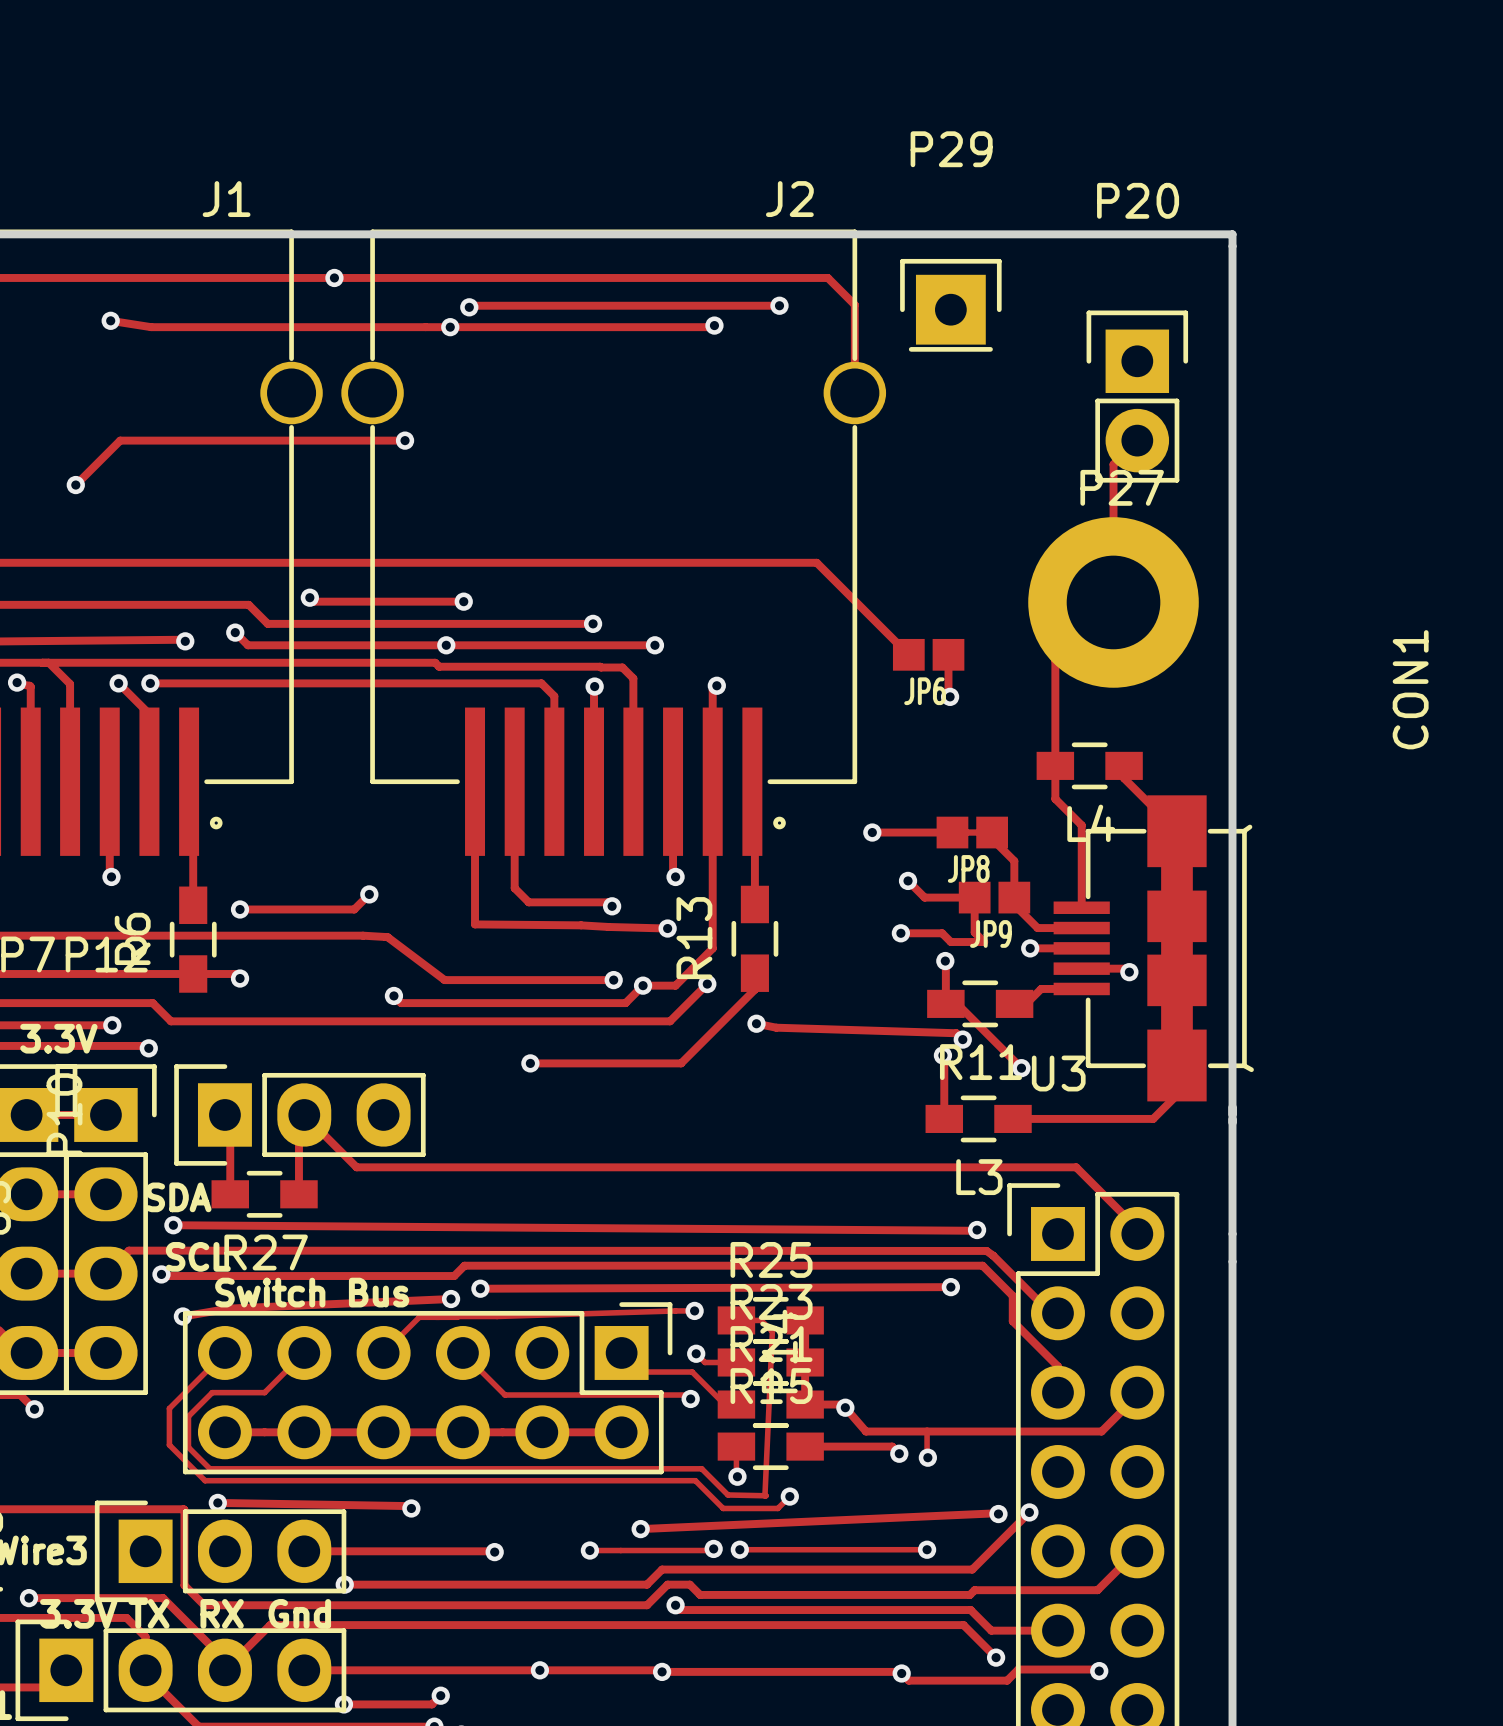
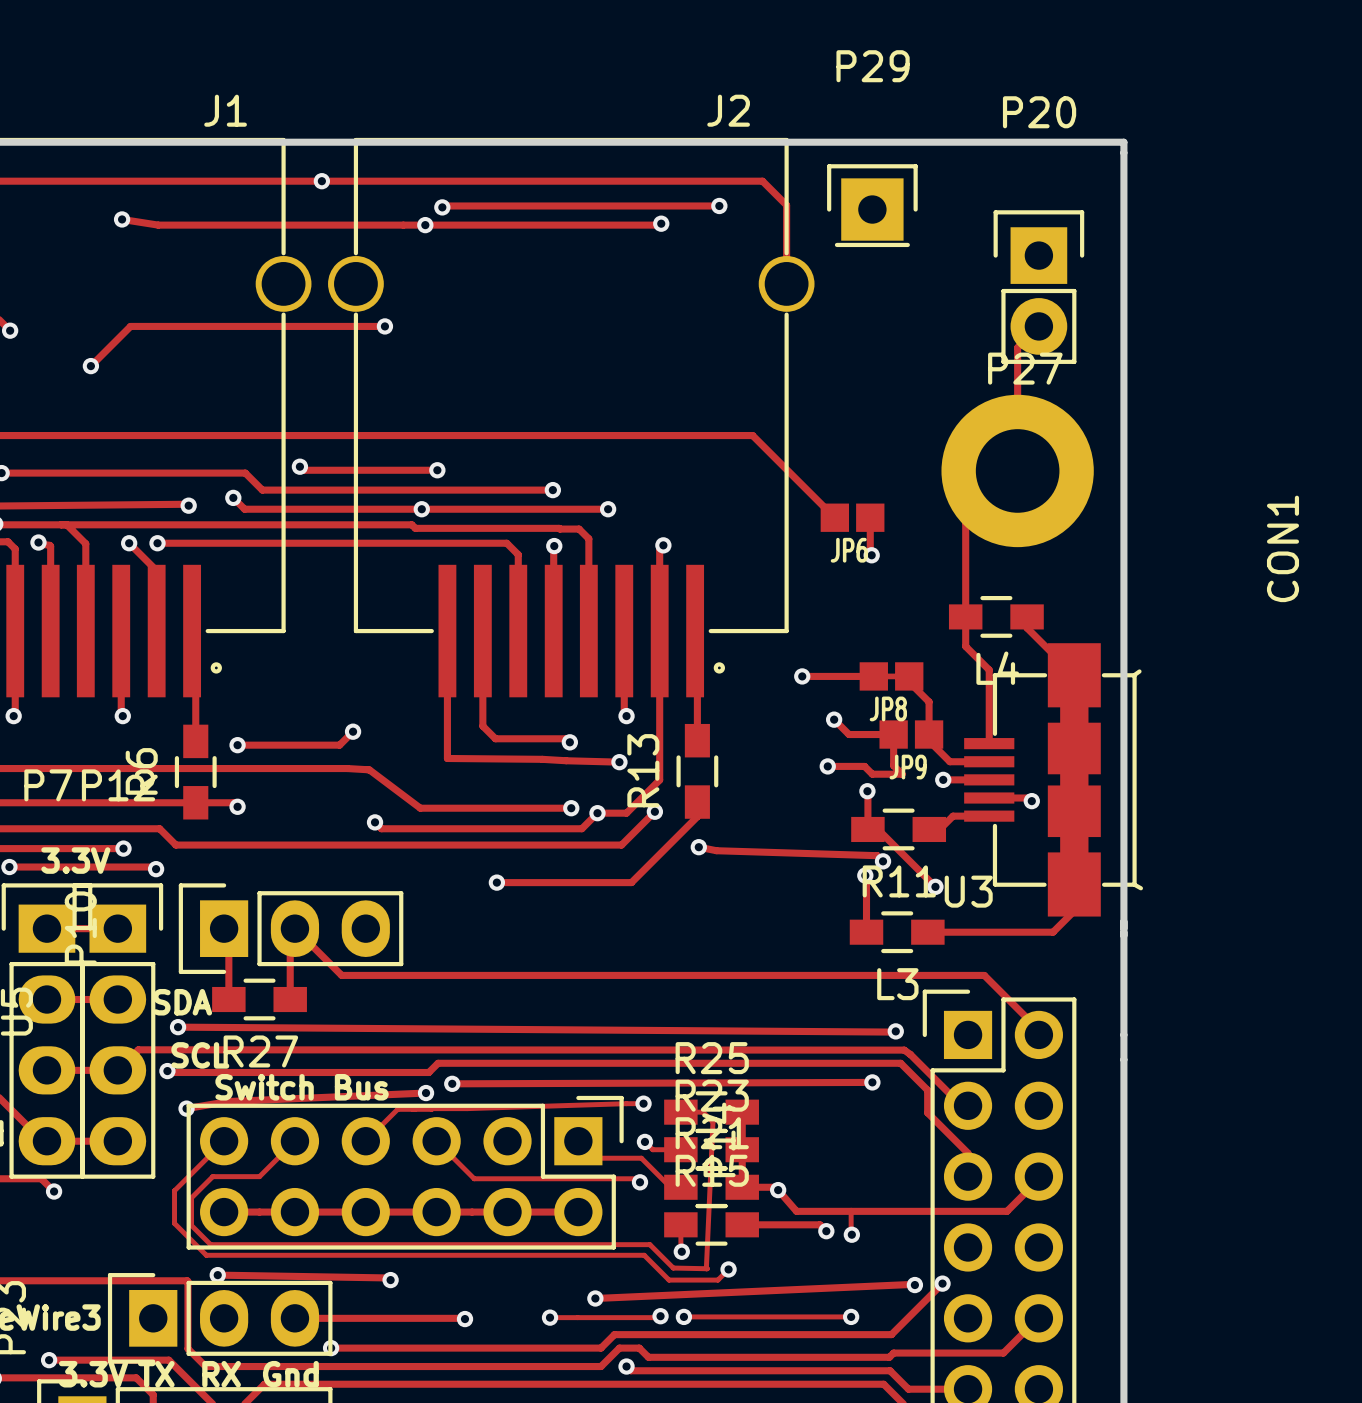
CON1 footprint: [1053, 795, 1254, 1102] -> [964, 643, 1144, 917]

